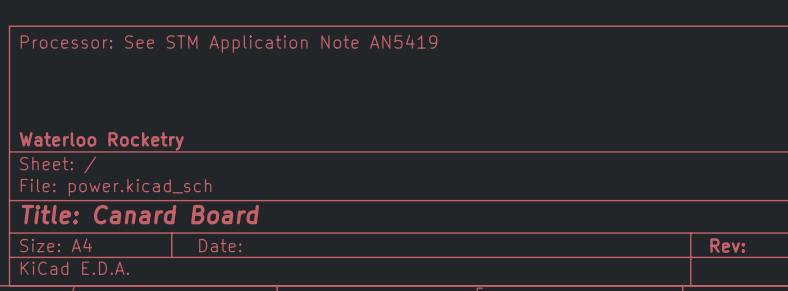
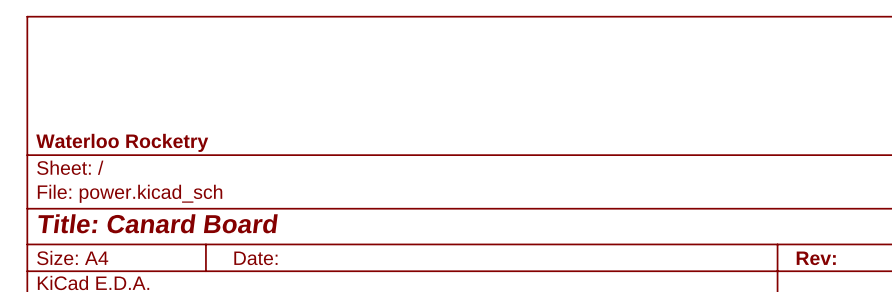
title block: Processor: See STM Application Note AN5419 (229, 43) -> none

